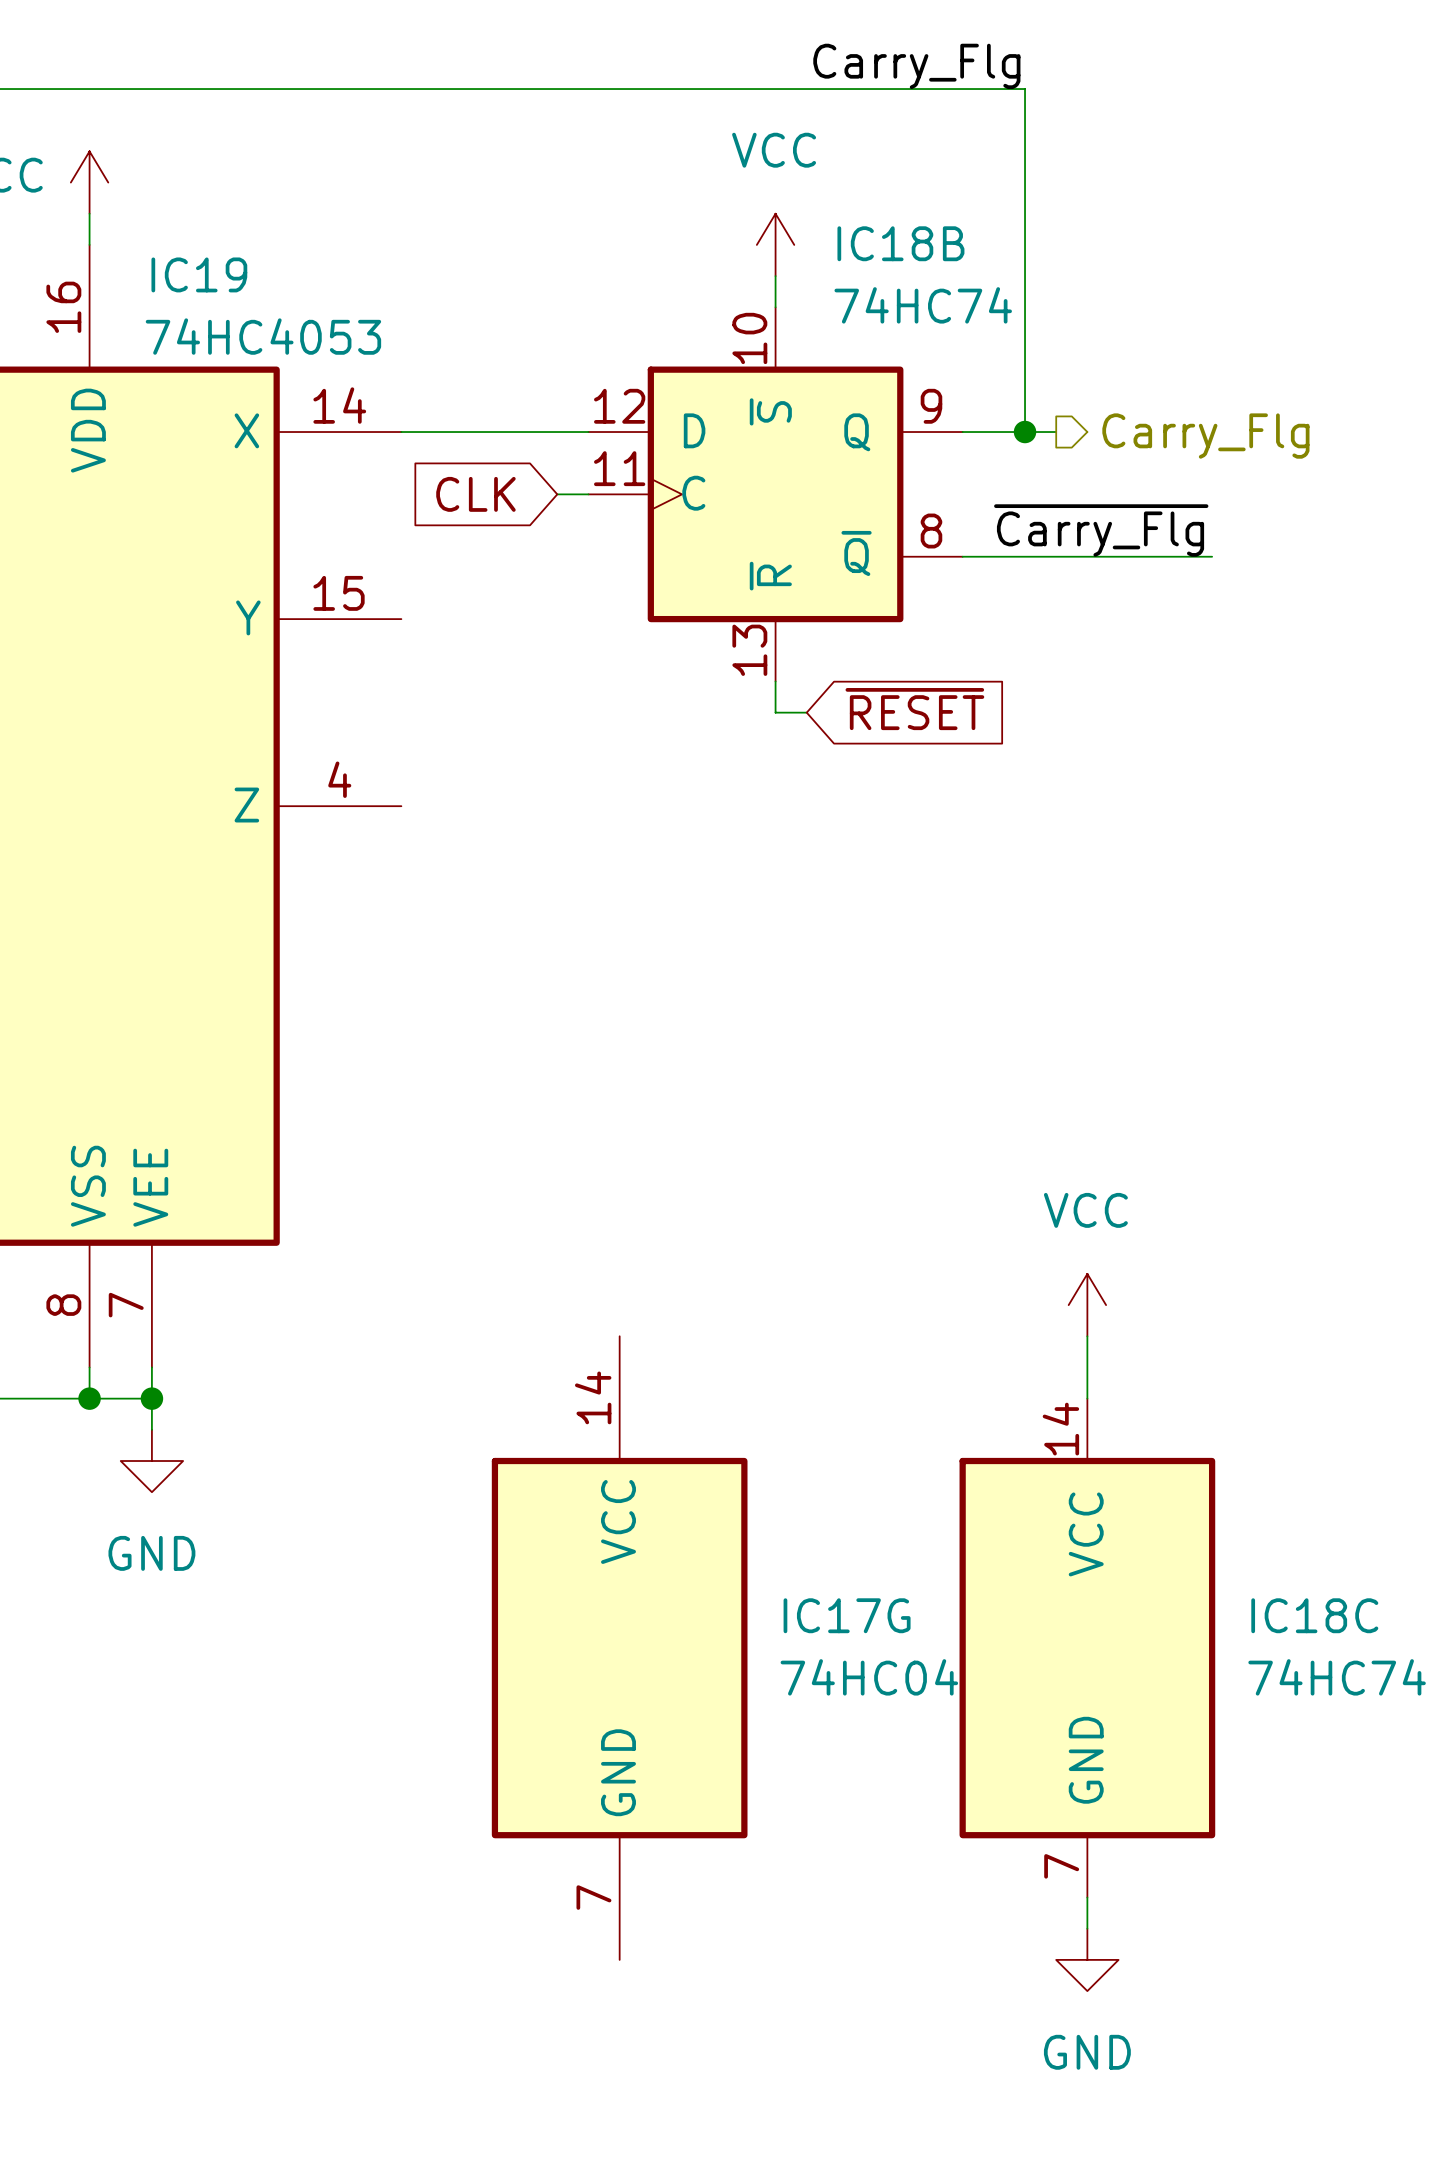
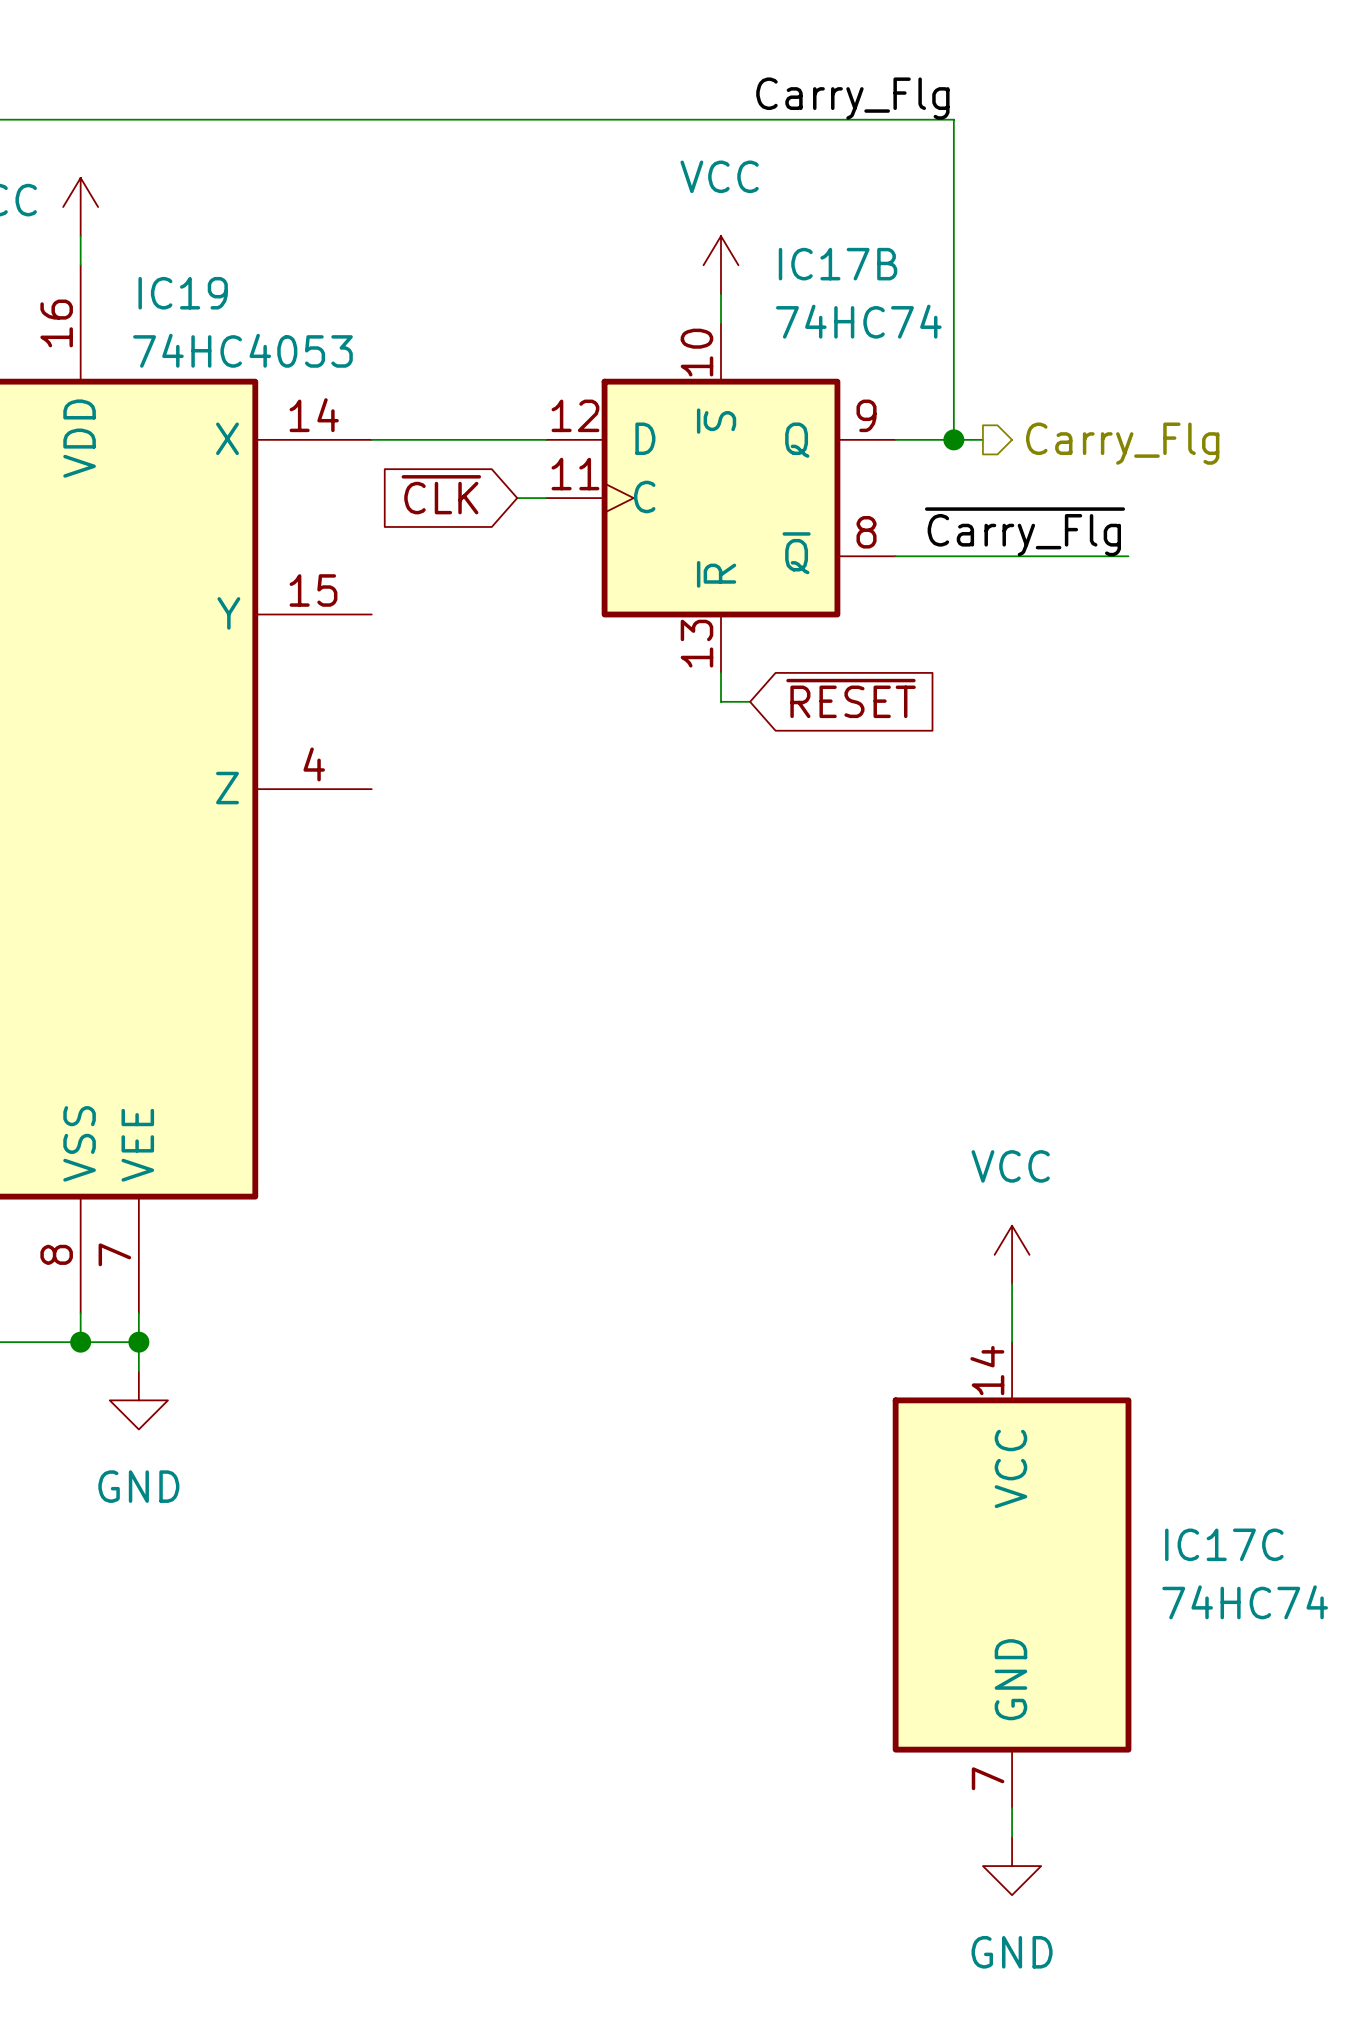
IC18B name: IC18B (900, 243) -> IC17B (838, 264)
global label: CLK (475, 494) -> ~{CLK} (441, 494)
IC18C name: IC18C (1314, 1615) -> IC17C (1224, 1544)
IC17G: 74HC04 (619, 1648) -> none

